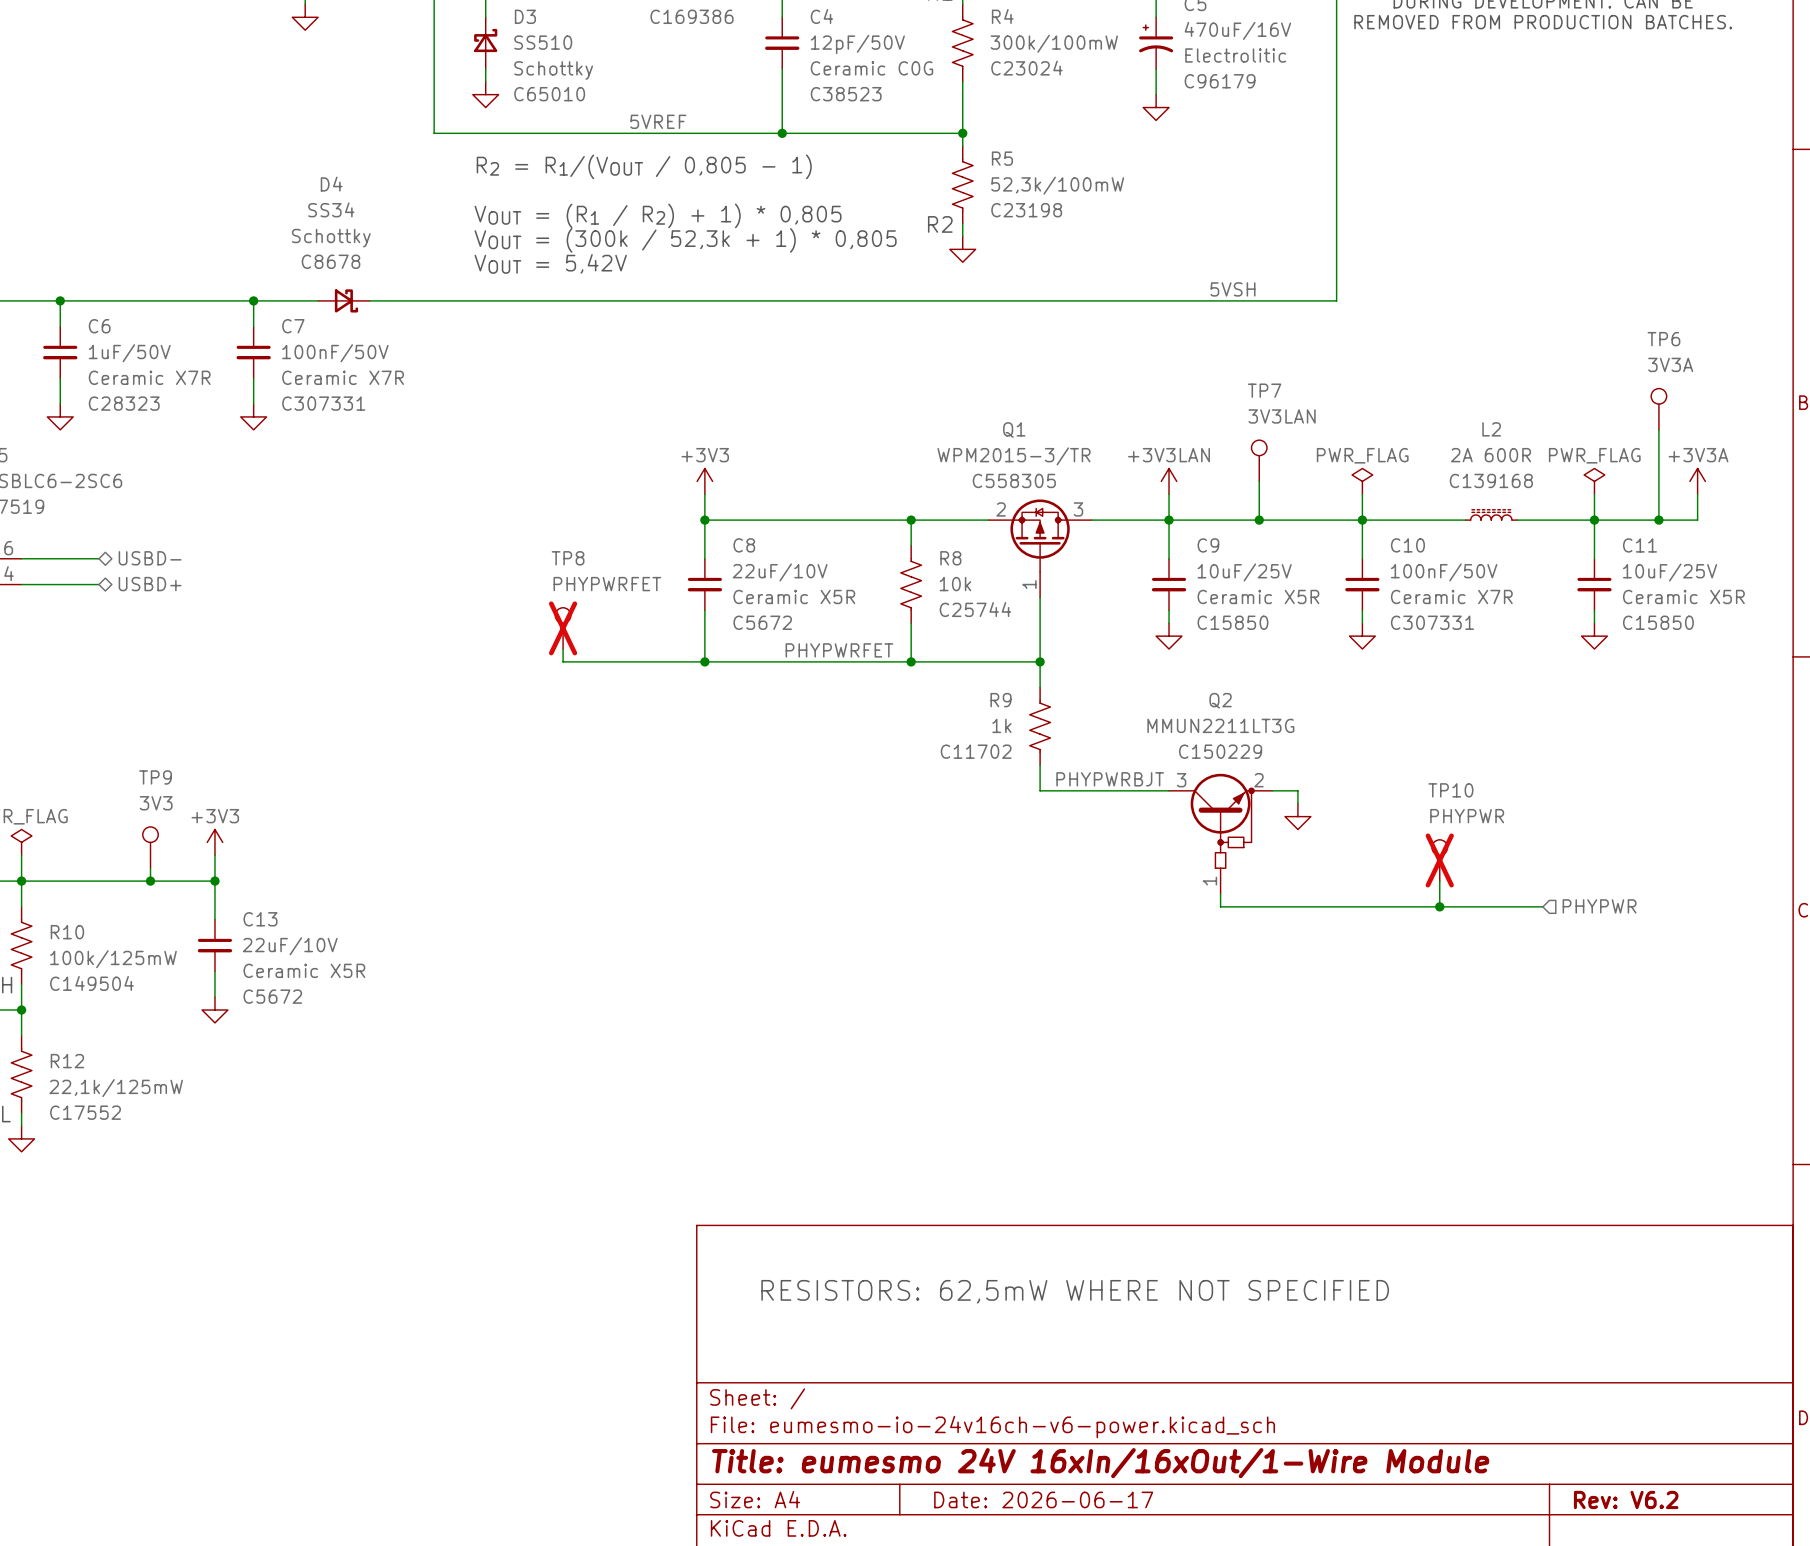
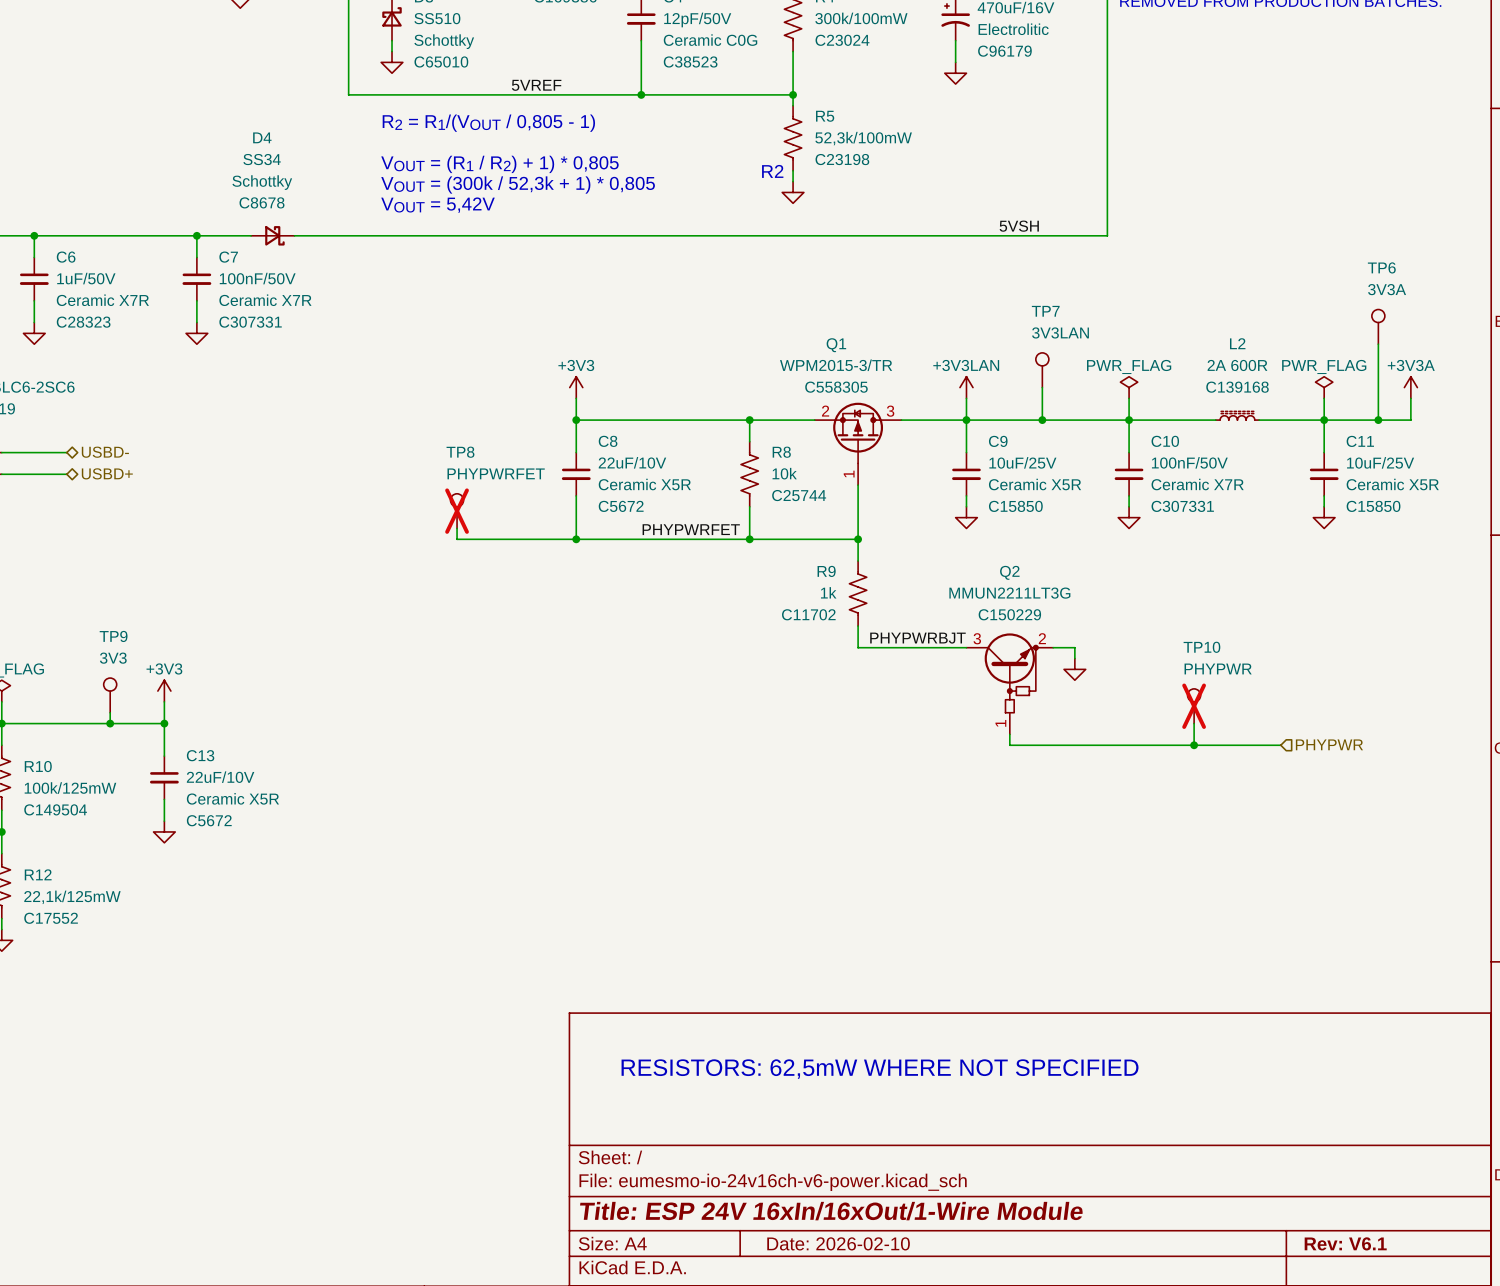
title block: Title: eumesmo 24V 16xIn/16xOut/1-Wire Module (1100, 1463) -> Title: ESP 24V 16xIn/16xOut/1-Wire Module (831, 1211)
title block: Date: 2026-06-17 (1043, 1499) -> Date: 2026-02-10 (838, 1243)
title block: Rev: V6.2 (1626, 1499) -> Rev: V6.1 (1345, 1243)

